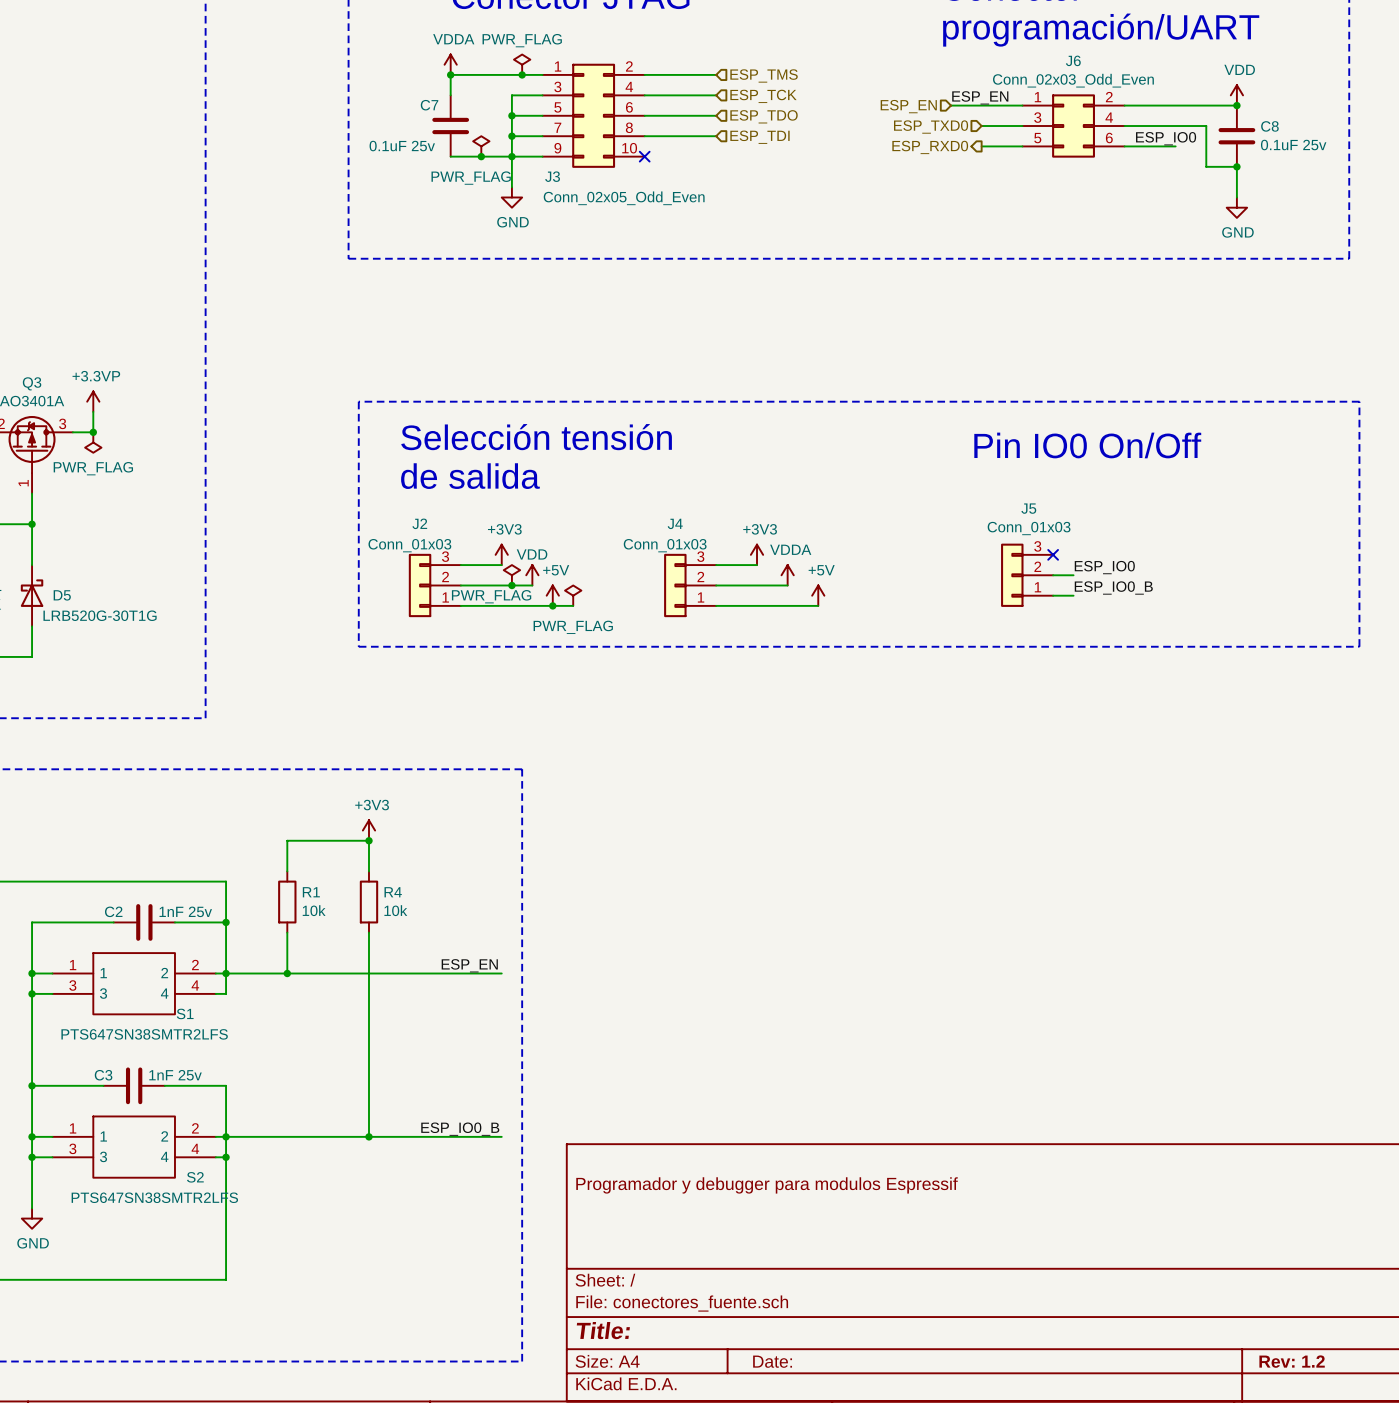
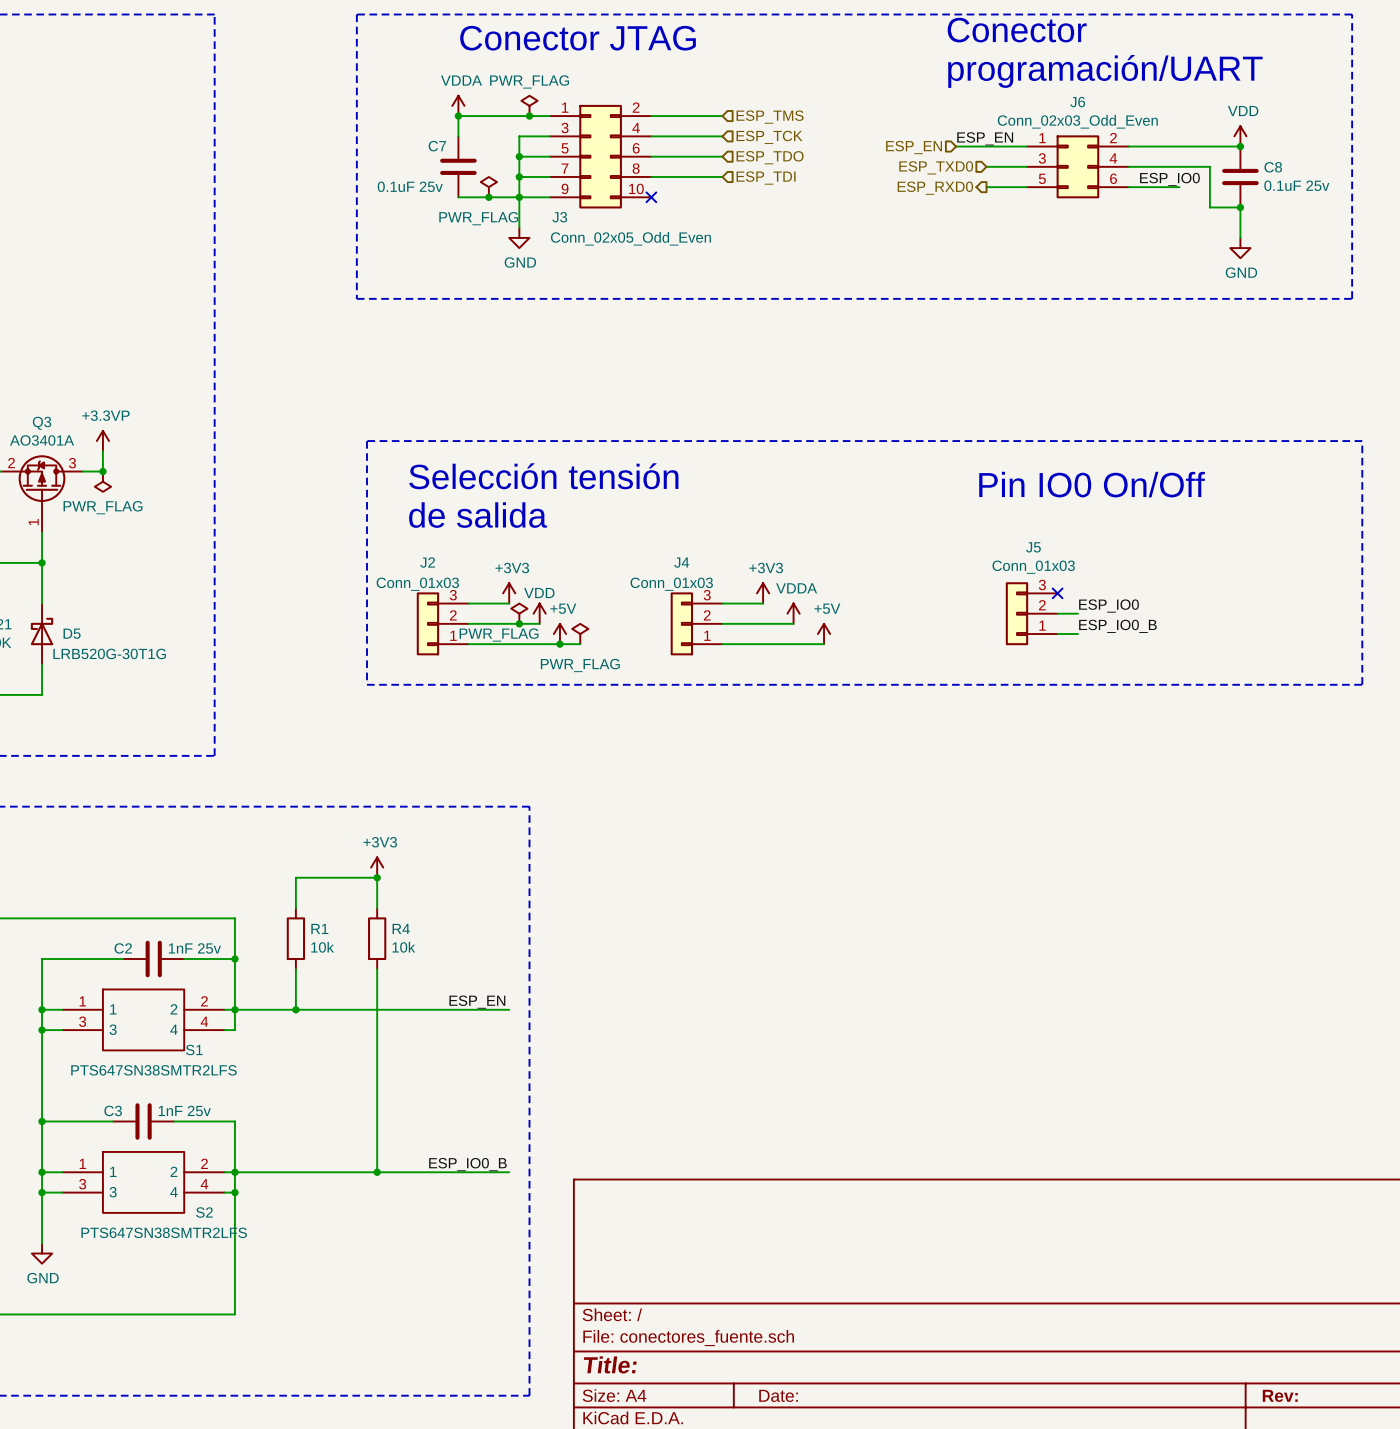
title block: Programador y debugger para modulos Espressif (767, 1185) -> none
title block: Rev: 1.2 (1292, 1361) -> Rev: (1280, 1395)

